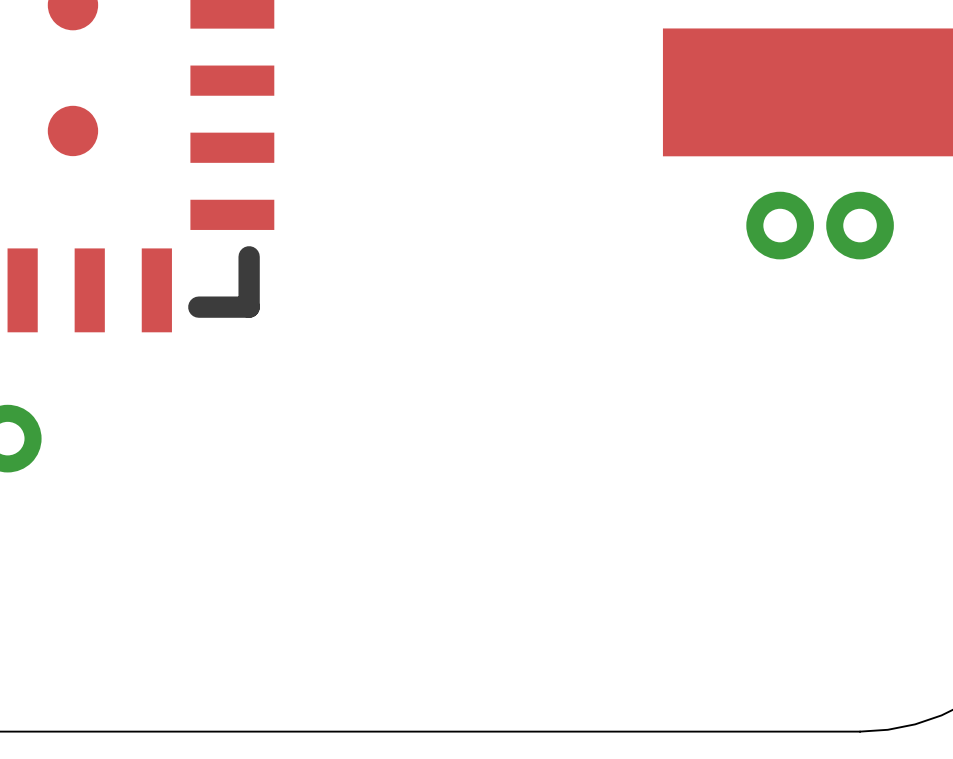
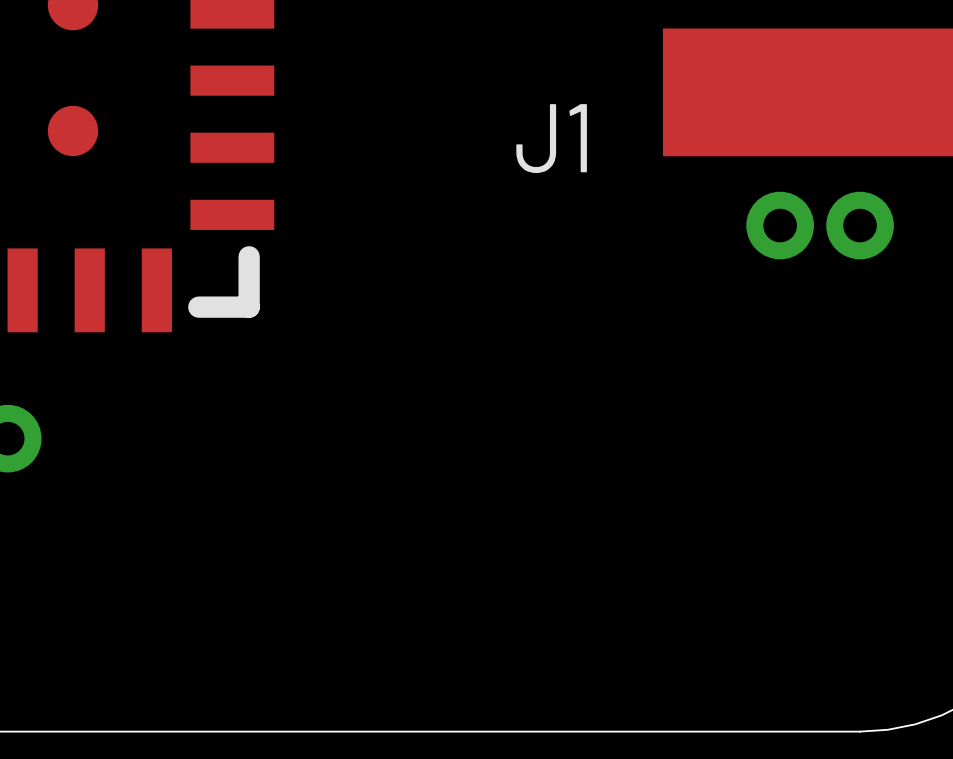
text: none -> J1 (551, 138)

